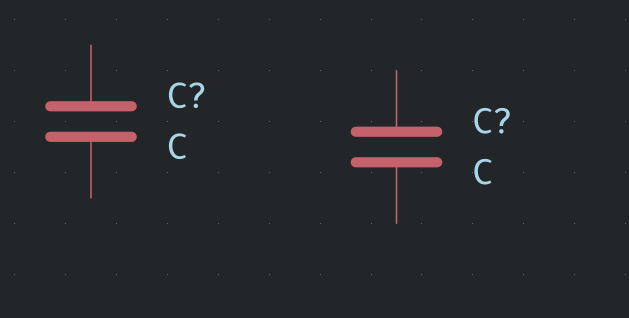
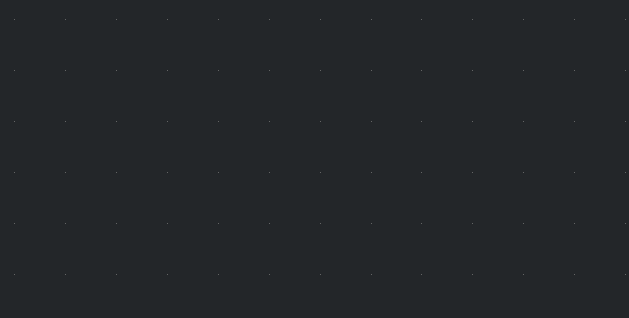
C?: C (90, 121) -> none
C?: C (396, 147) -> none

